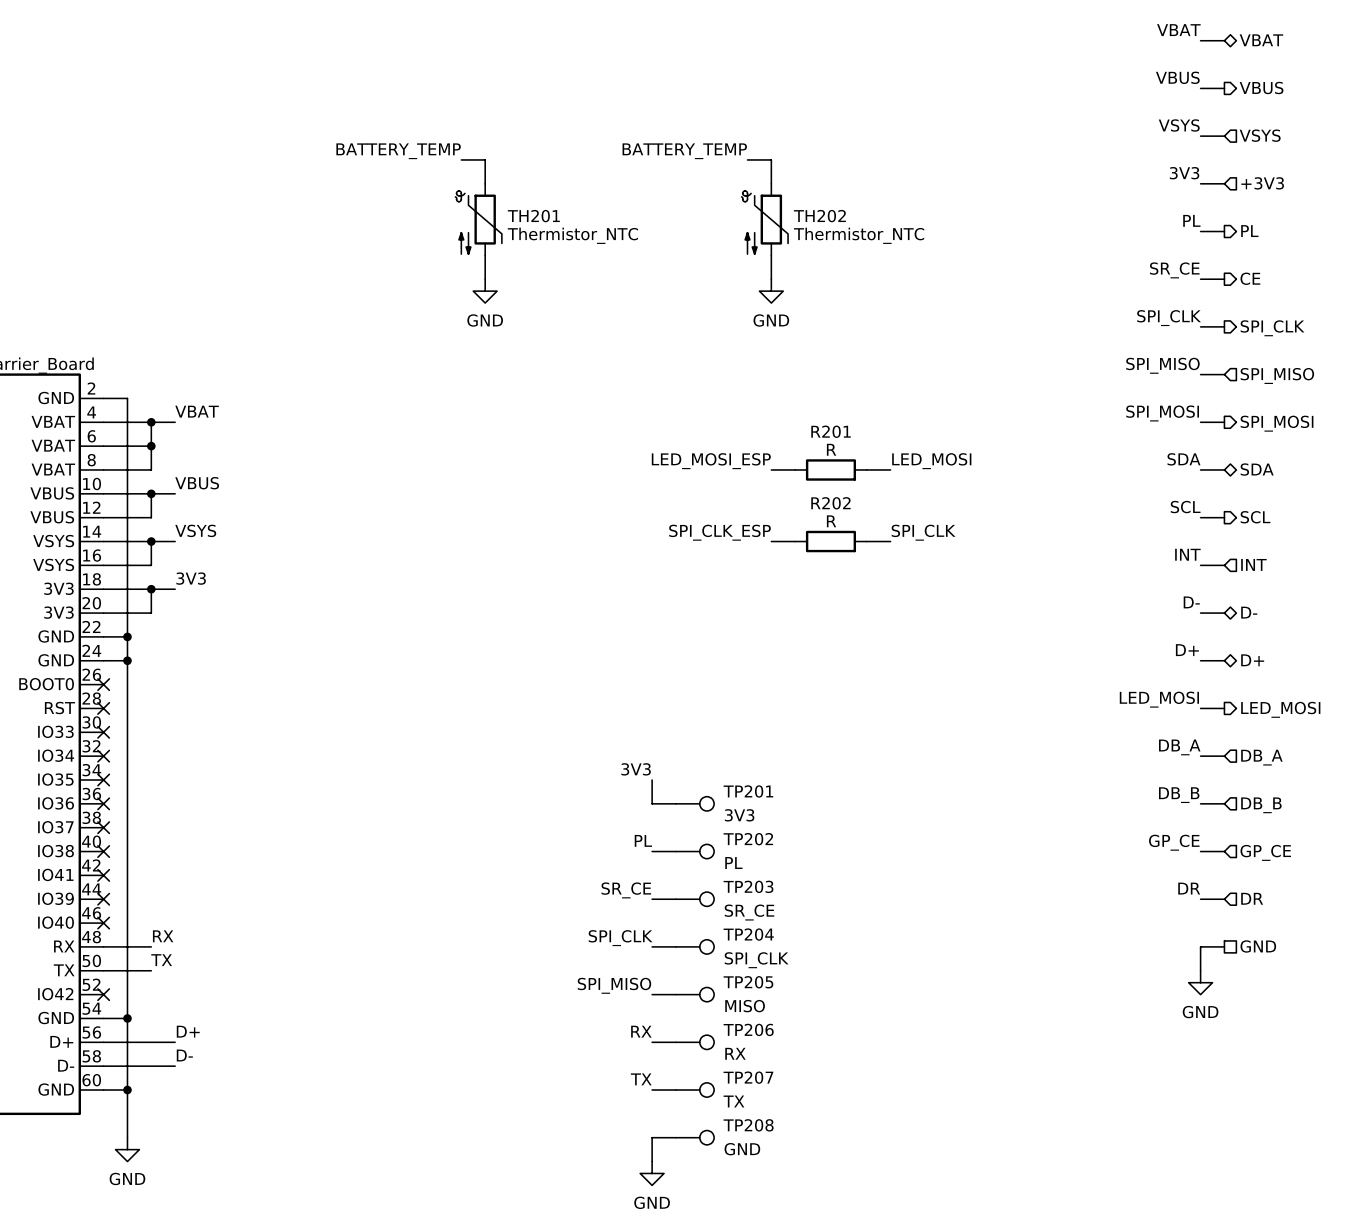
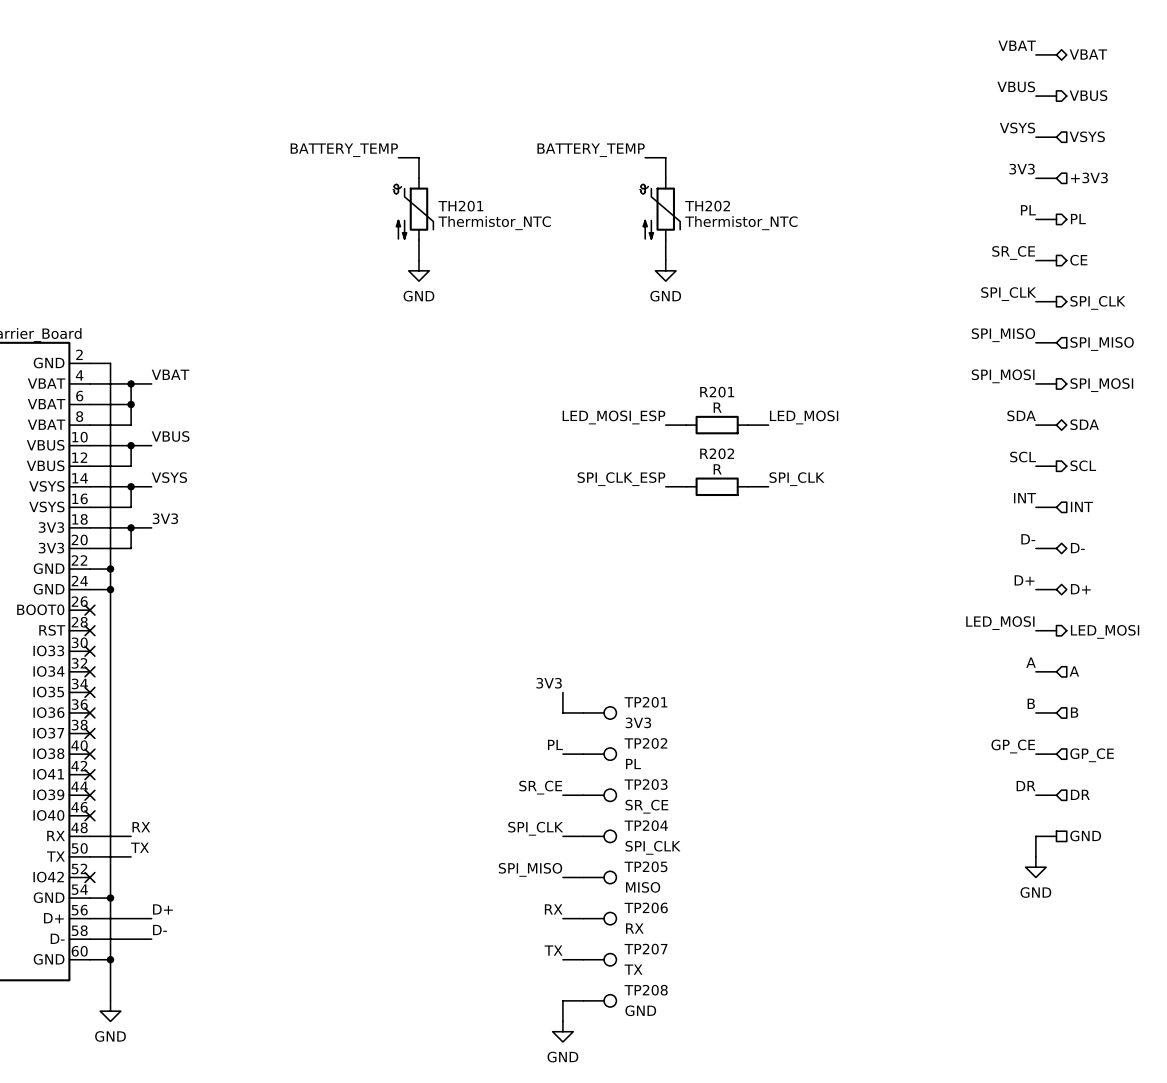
label: DB_A (1179, 747) -> A (1031, 662)
hierarchical label: DB_A (1261, 757) -> A (1074, 671)
label: DB_B (1179, 795) -> B (1031, 703)
hierarchical label: DB_B (1261, 805) -> B (1074, 712)

